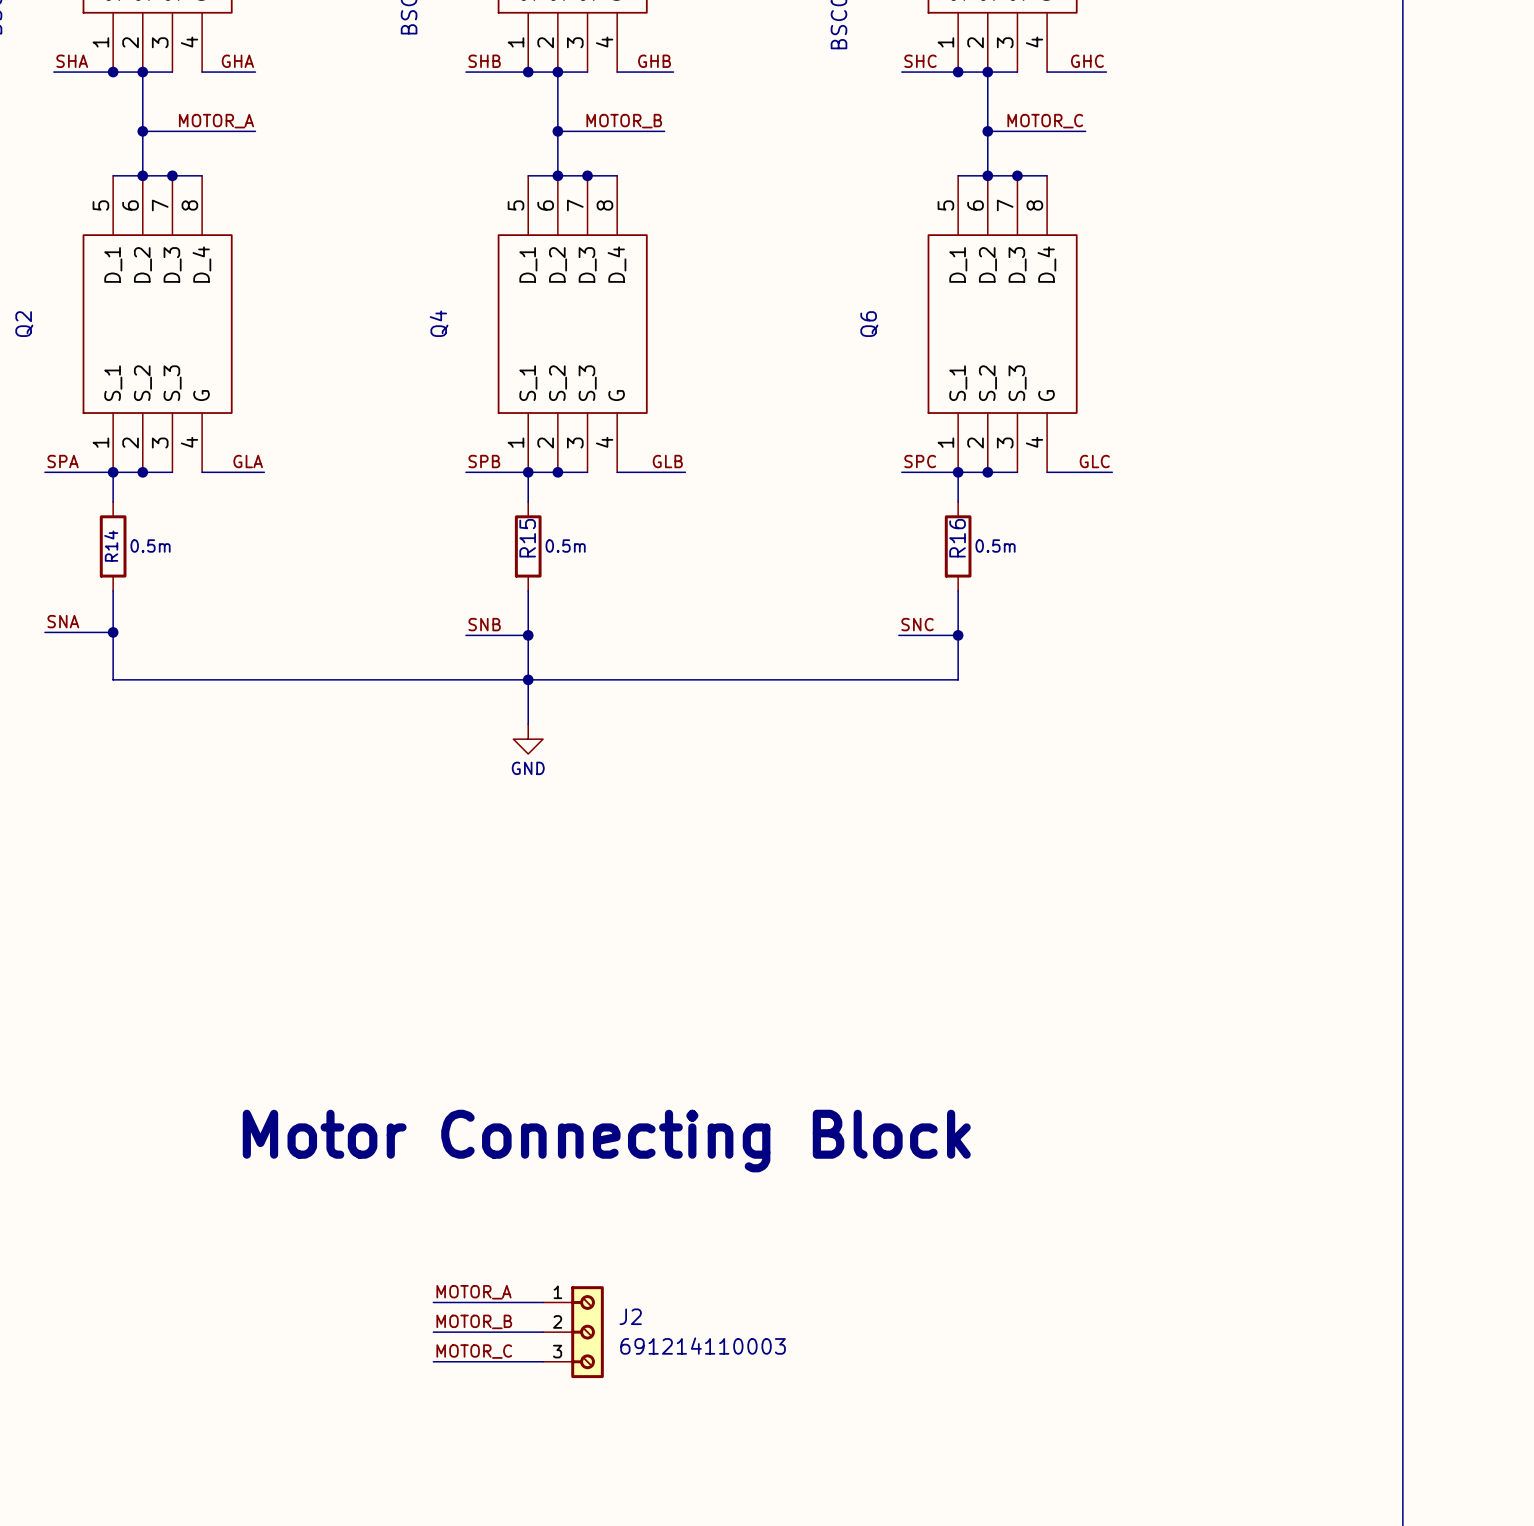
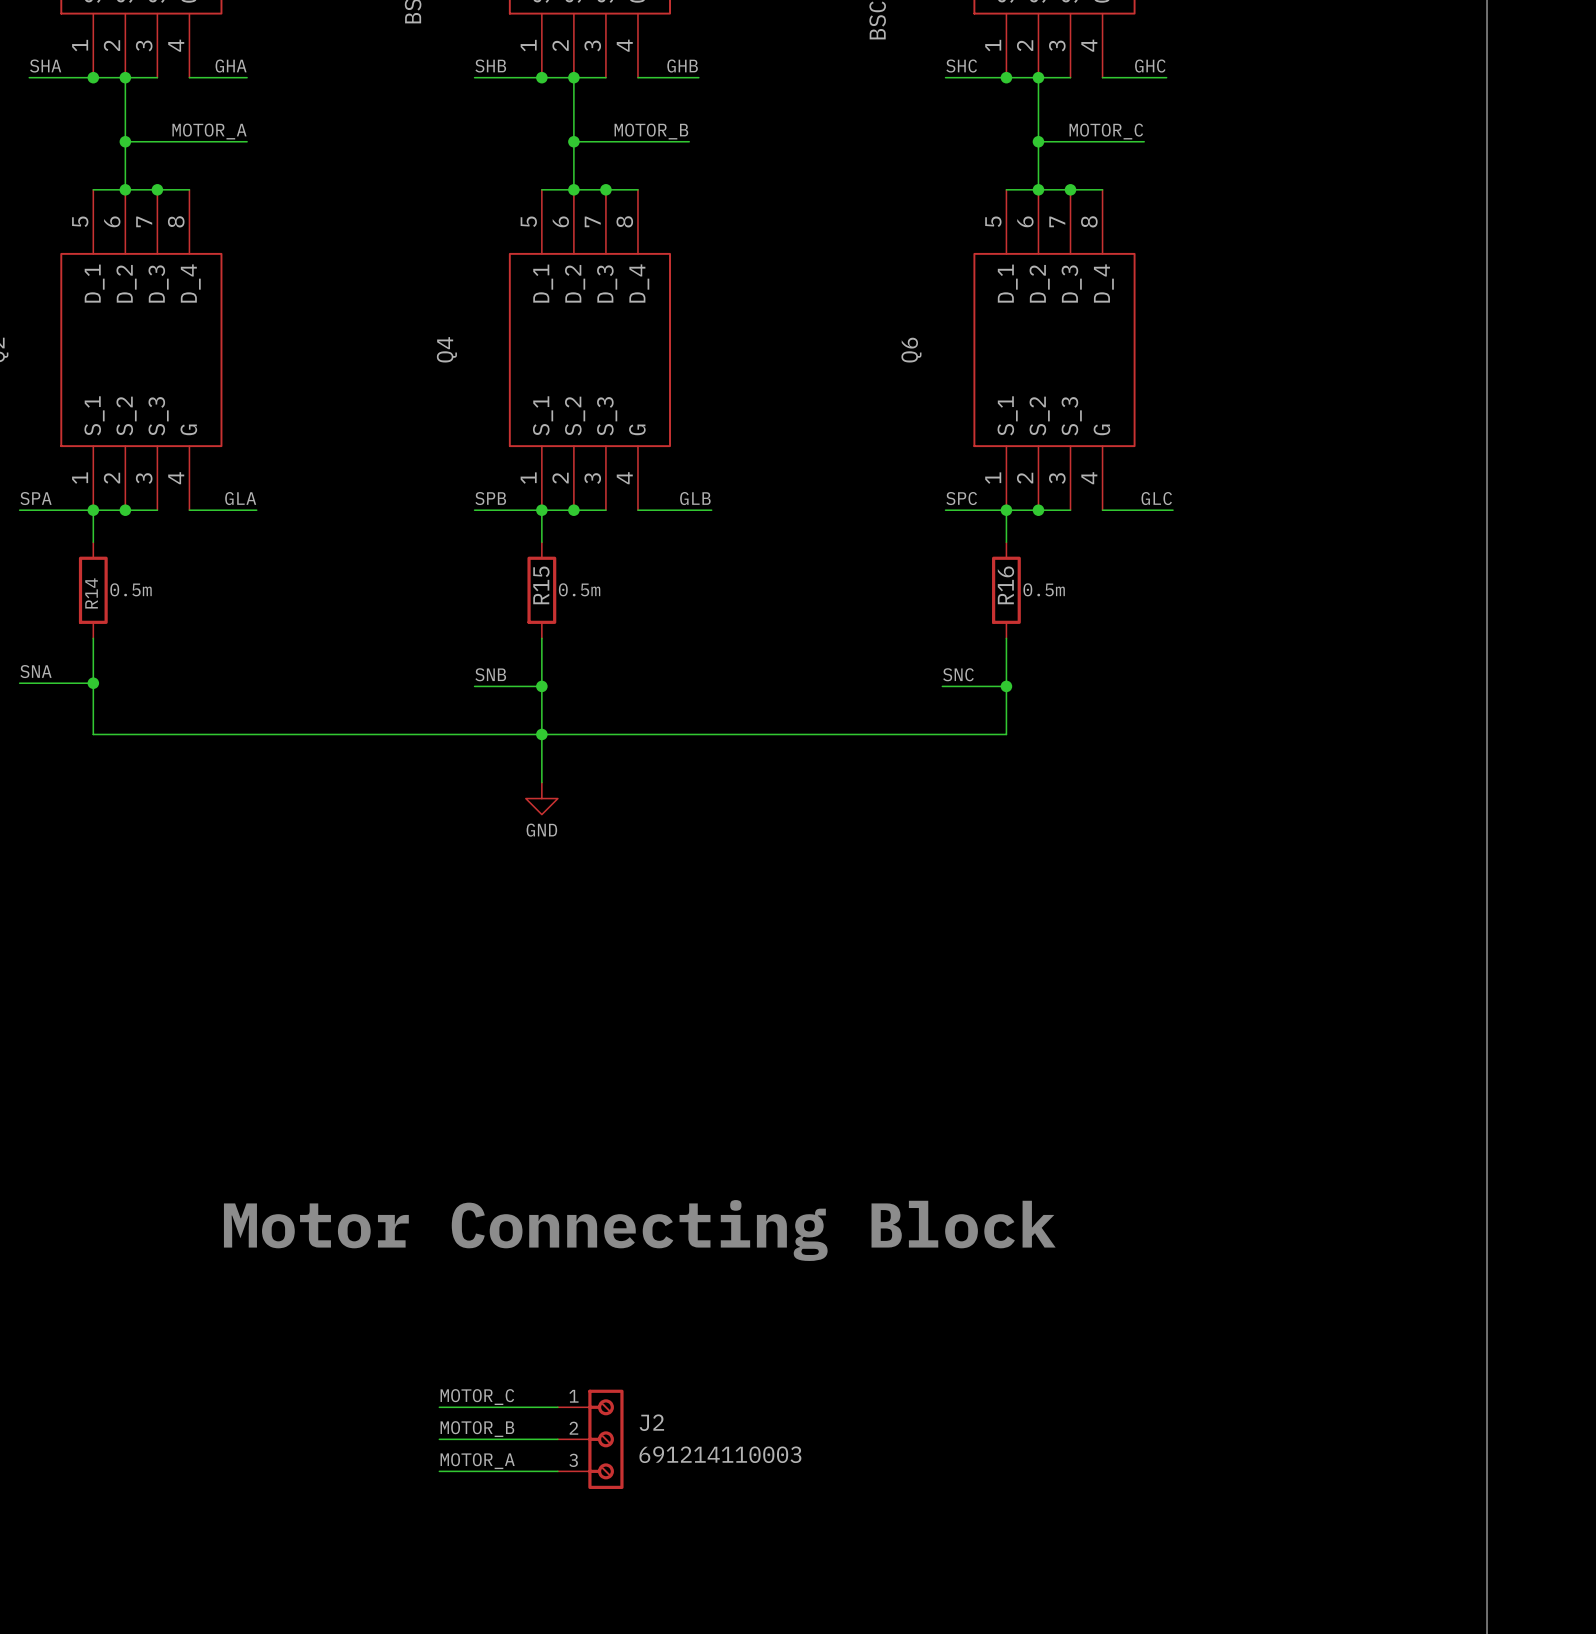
label: MOTOR_A (473, 1292) -> MOTOR_C (477, 1397)
label: MOTOR_C (474, 1351) -> MOTOR_A (477, 1461)

